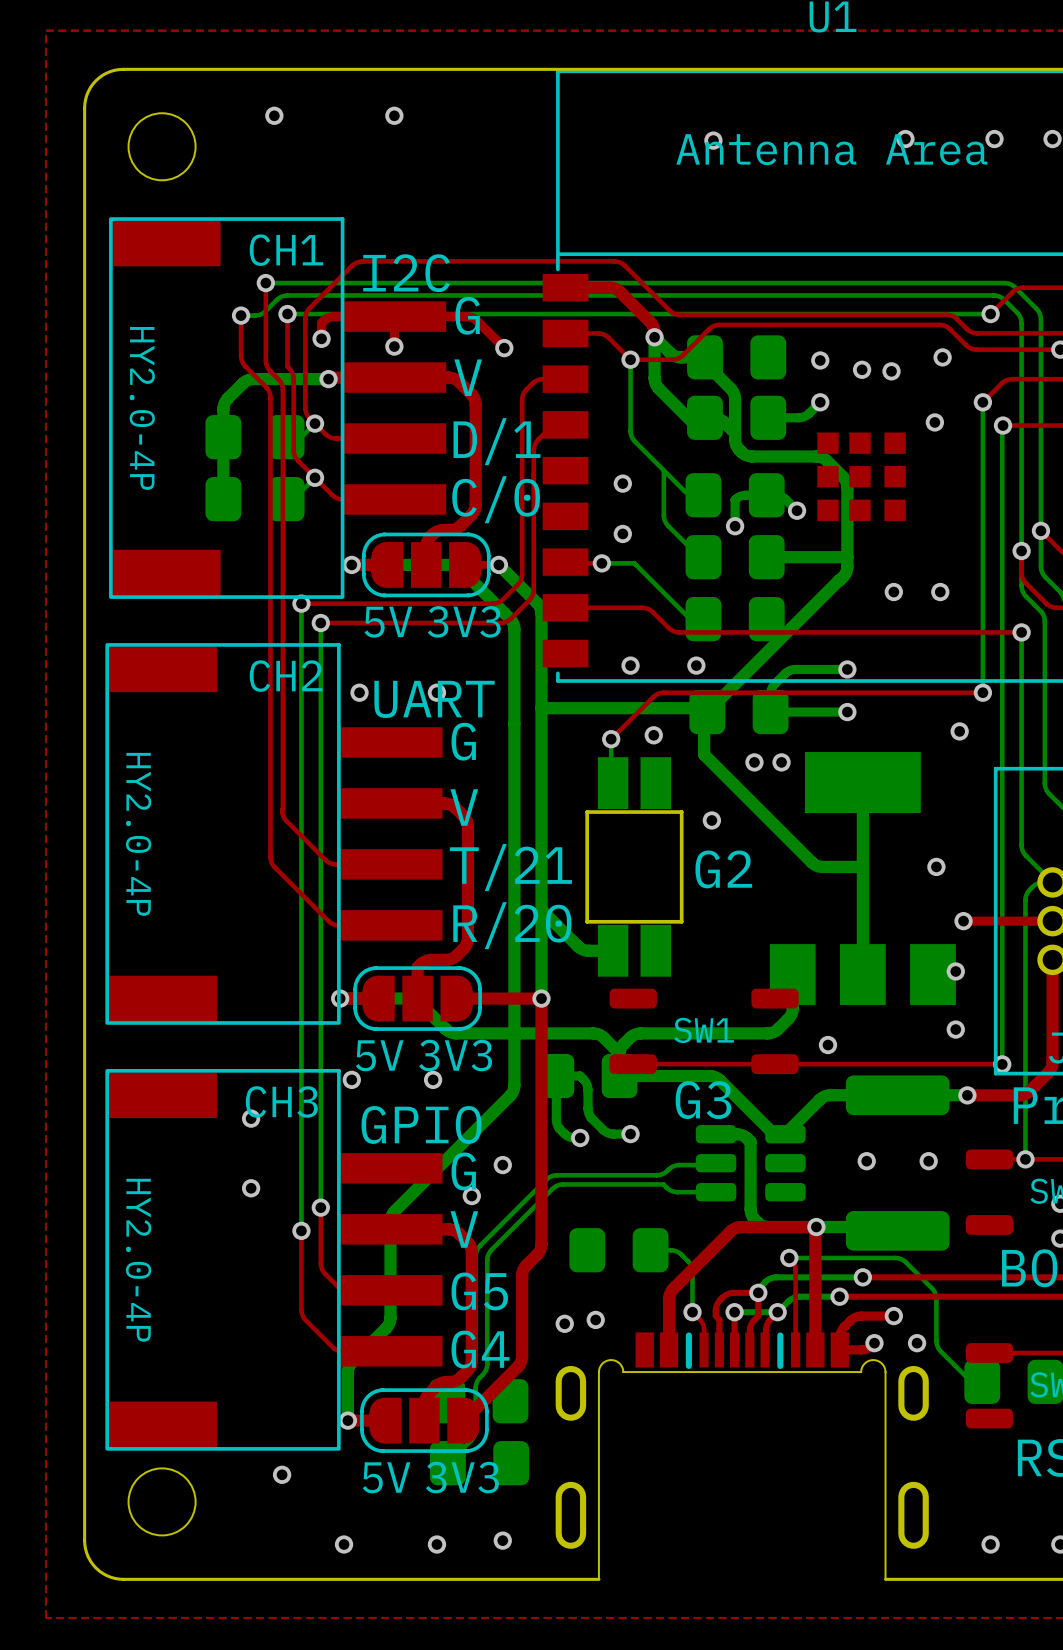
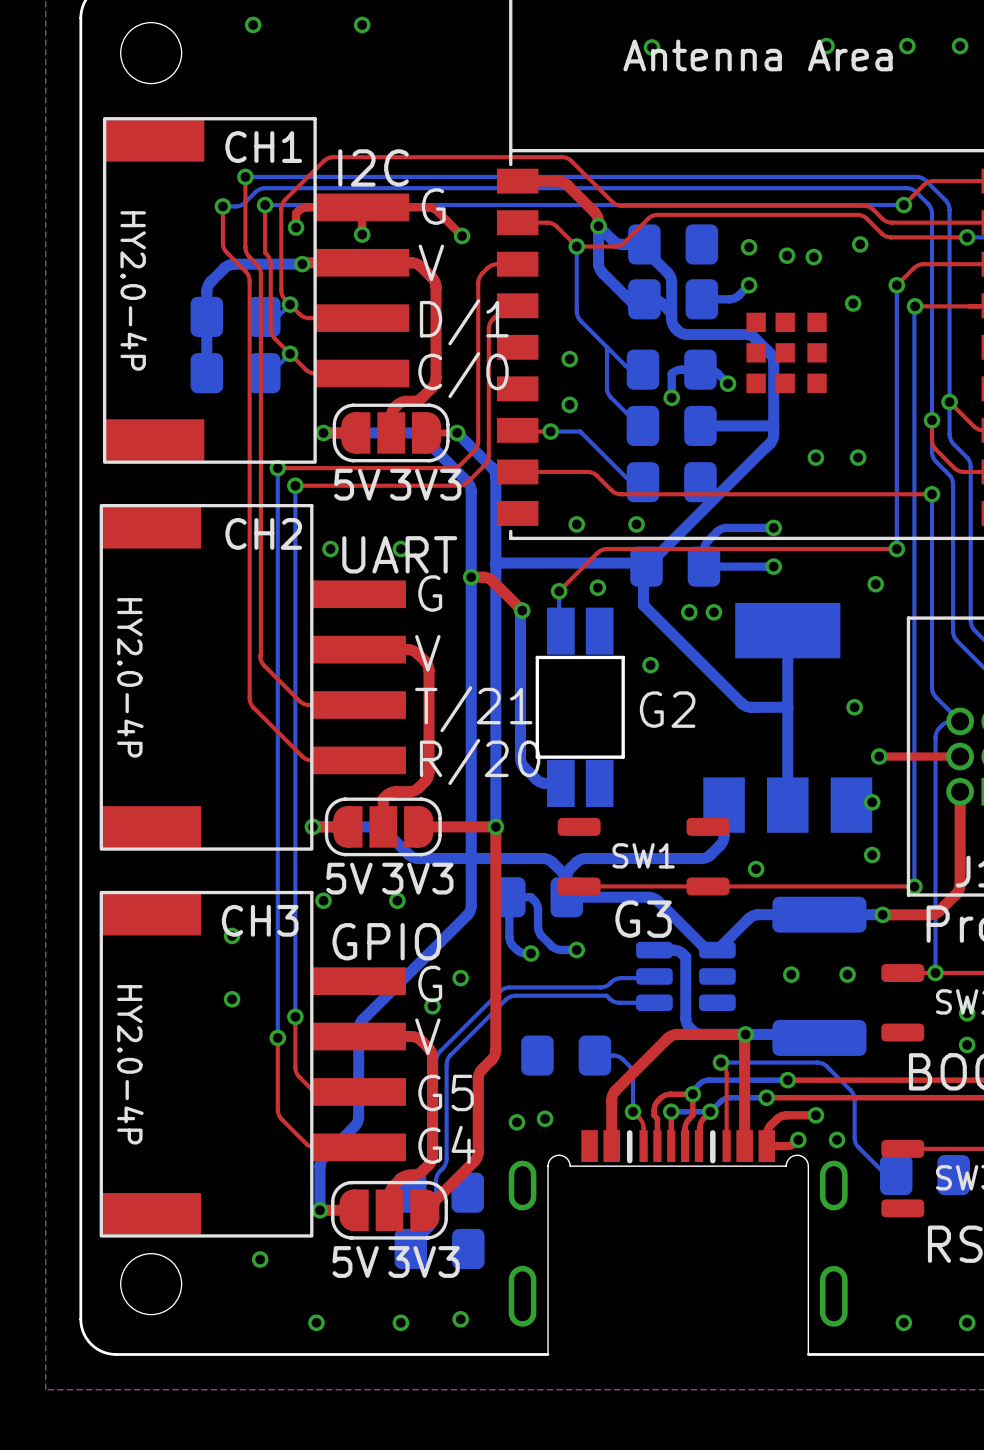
top track: none -> (471, 577) (490, 579) (522, 610)
via: none -> (471, 577)
via: none -> (522, 610)
bottom track: (541, 909) (580, 948) (596, 950) -> (522, 610) (520, 612) (520, 759) (523, 766) (536, 779) (546, 783)

